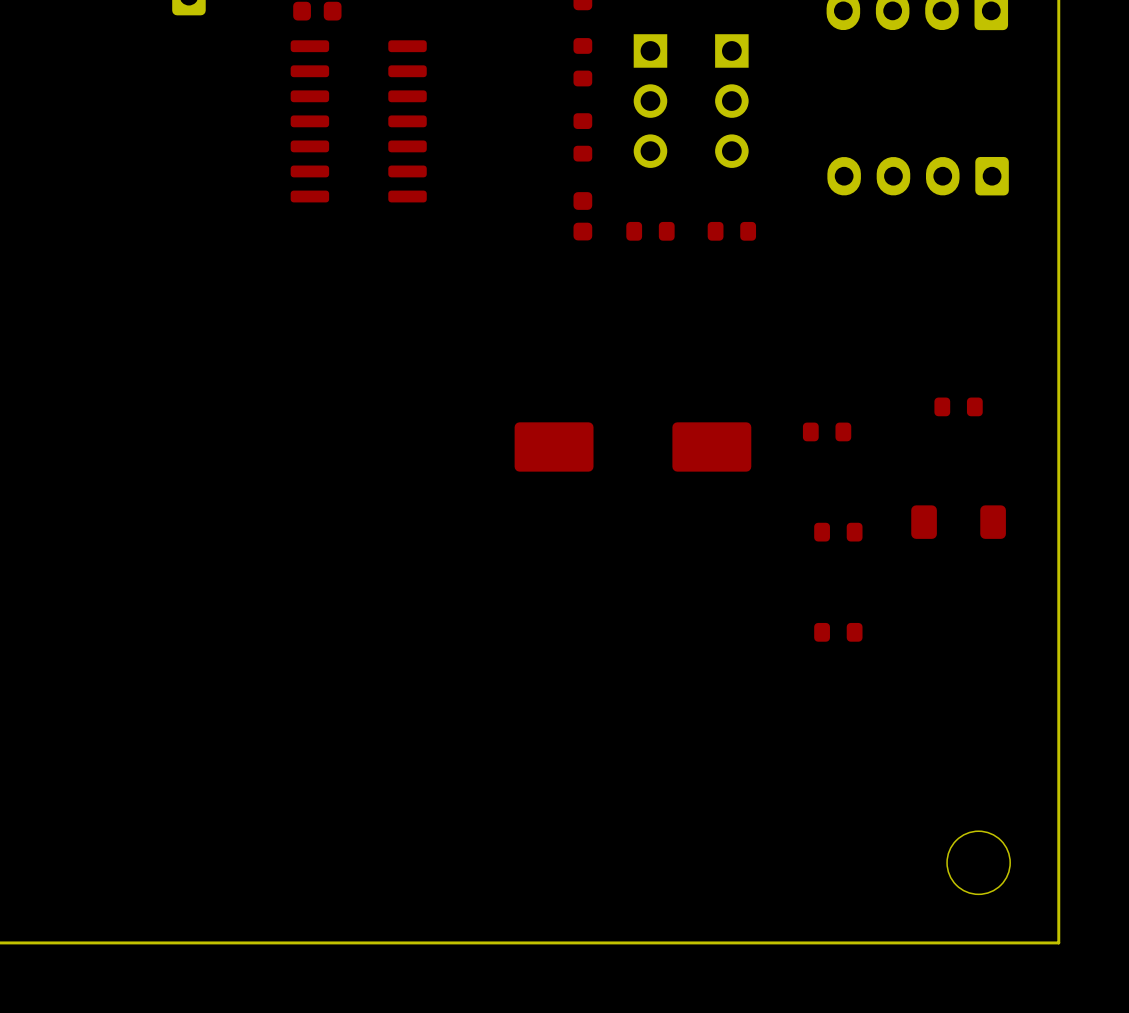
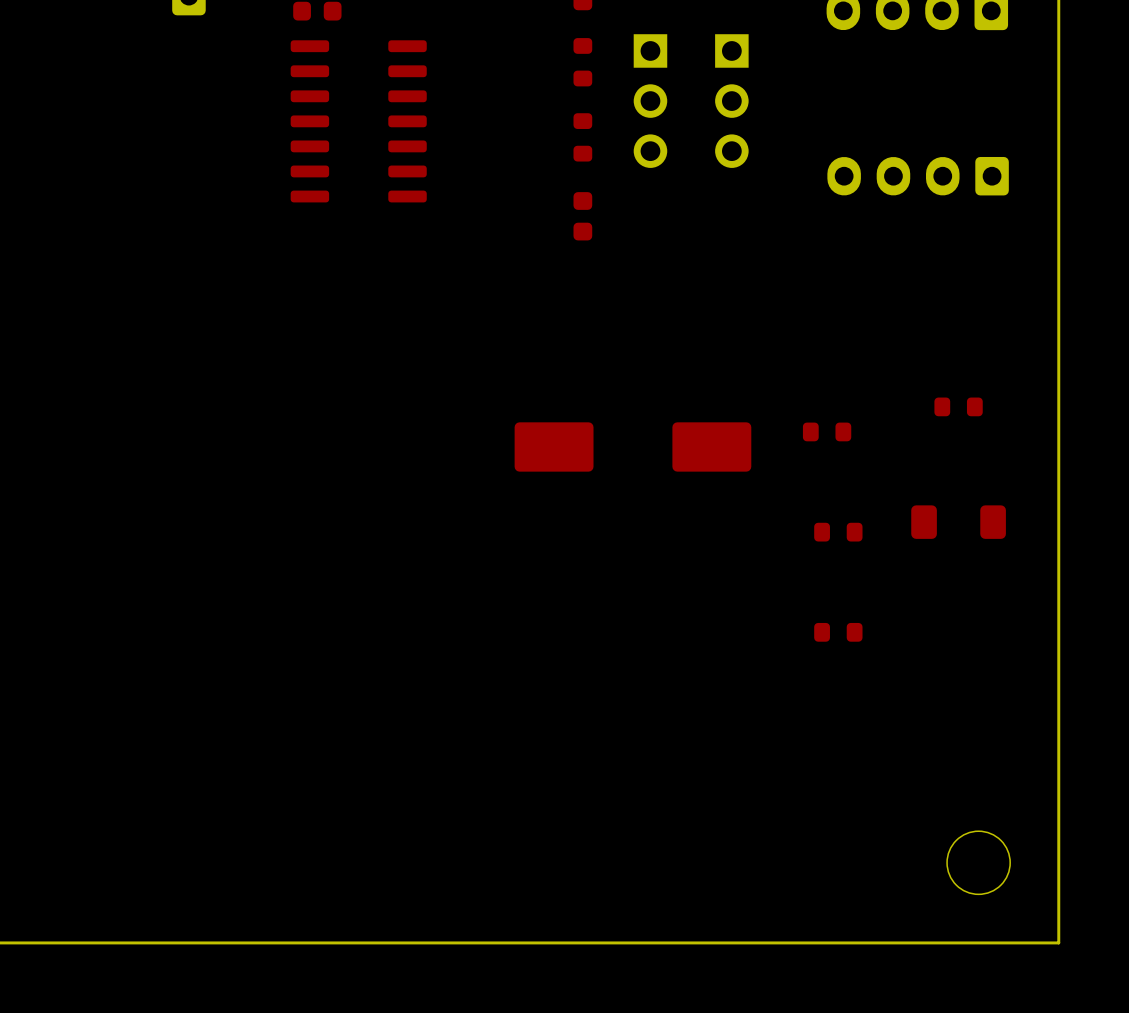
part: (650, 231) -> none
part: (731, 231) -> none

